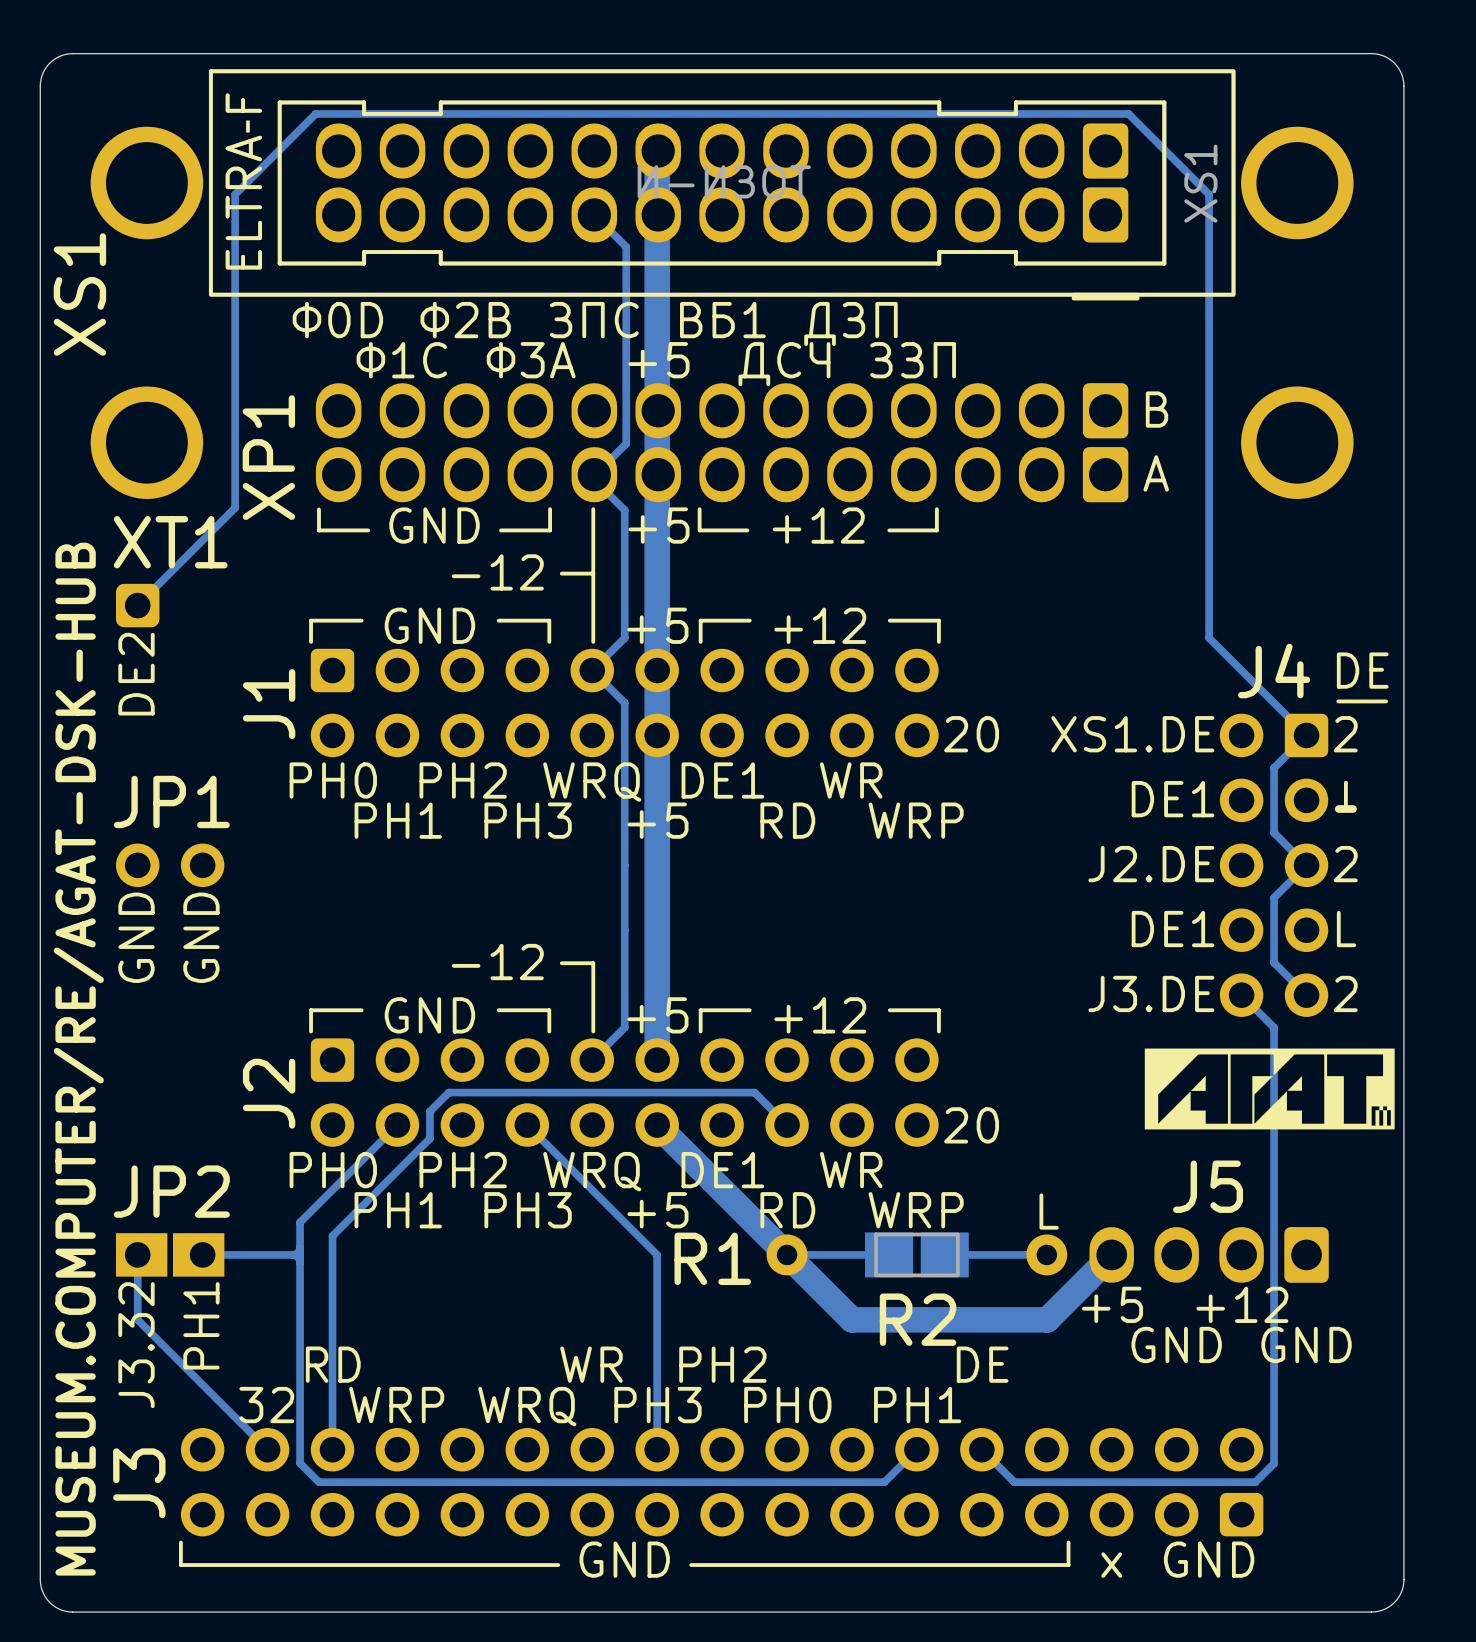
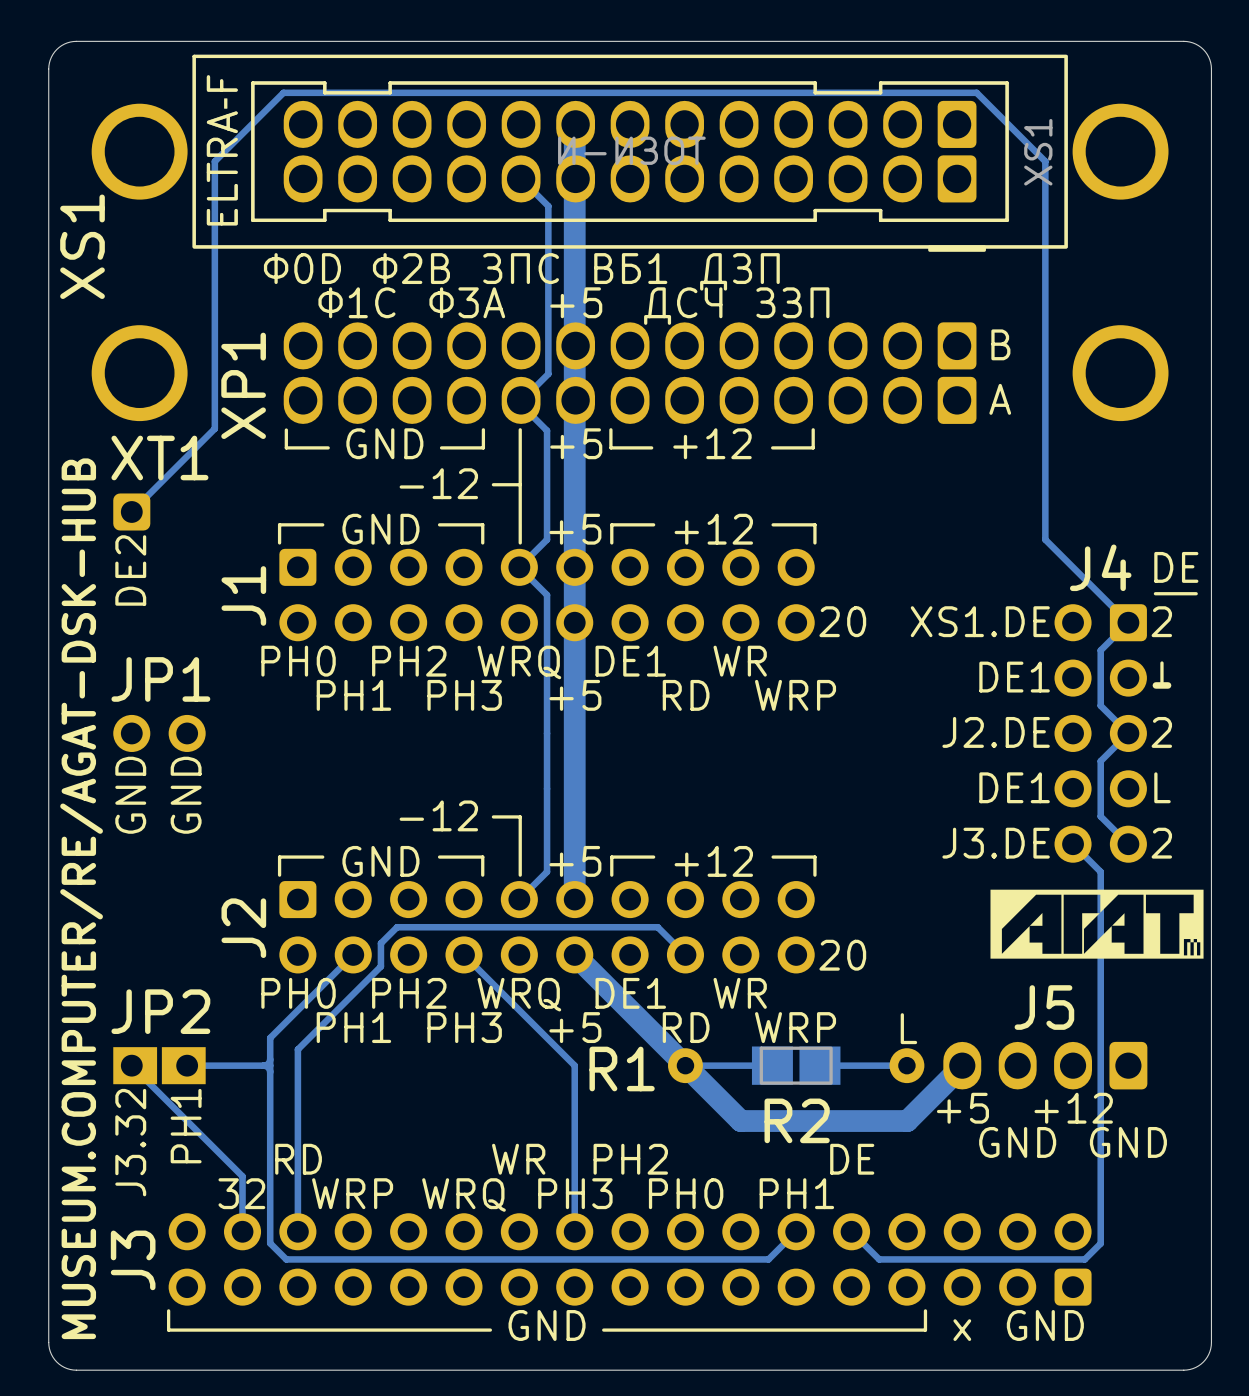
track: (137, 1254) (137, 1319) (267, 1449) -> (131, 1065) (242, 1176) (242, 1231)

